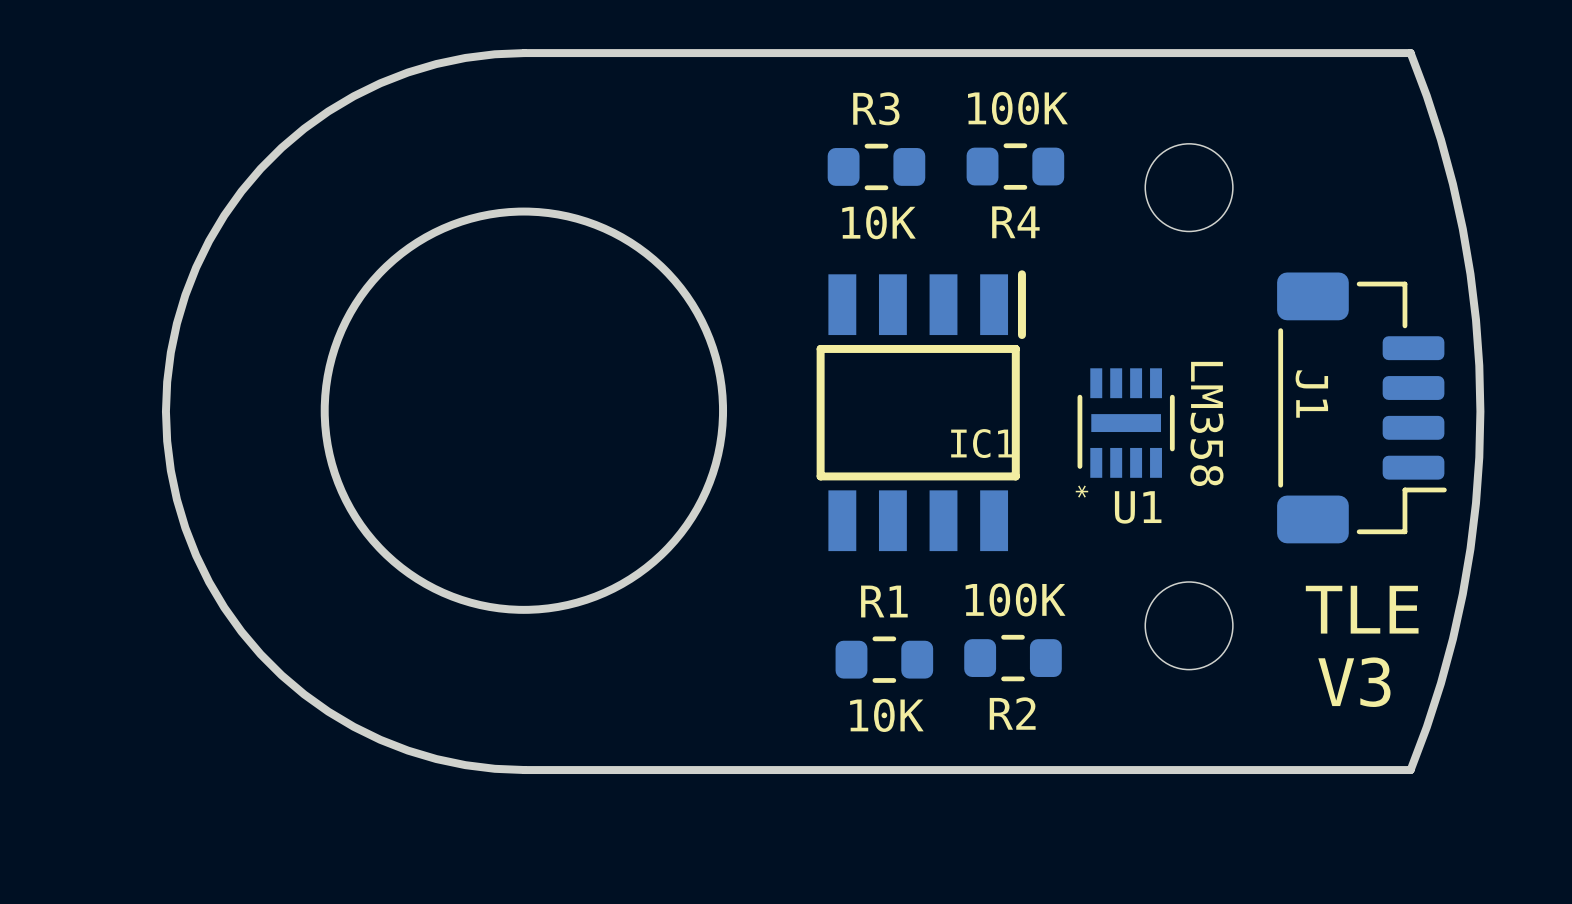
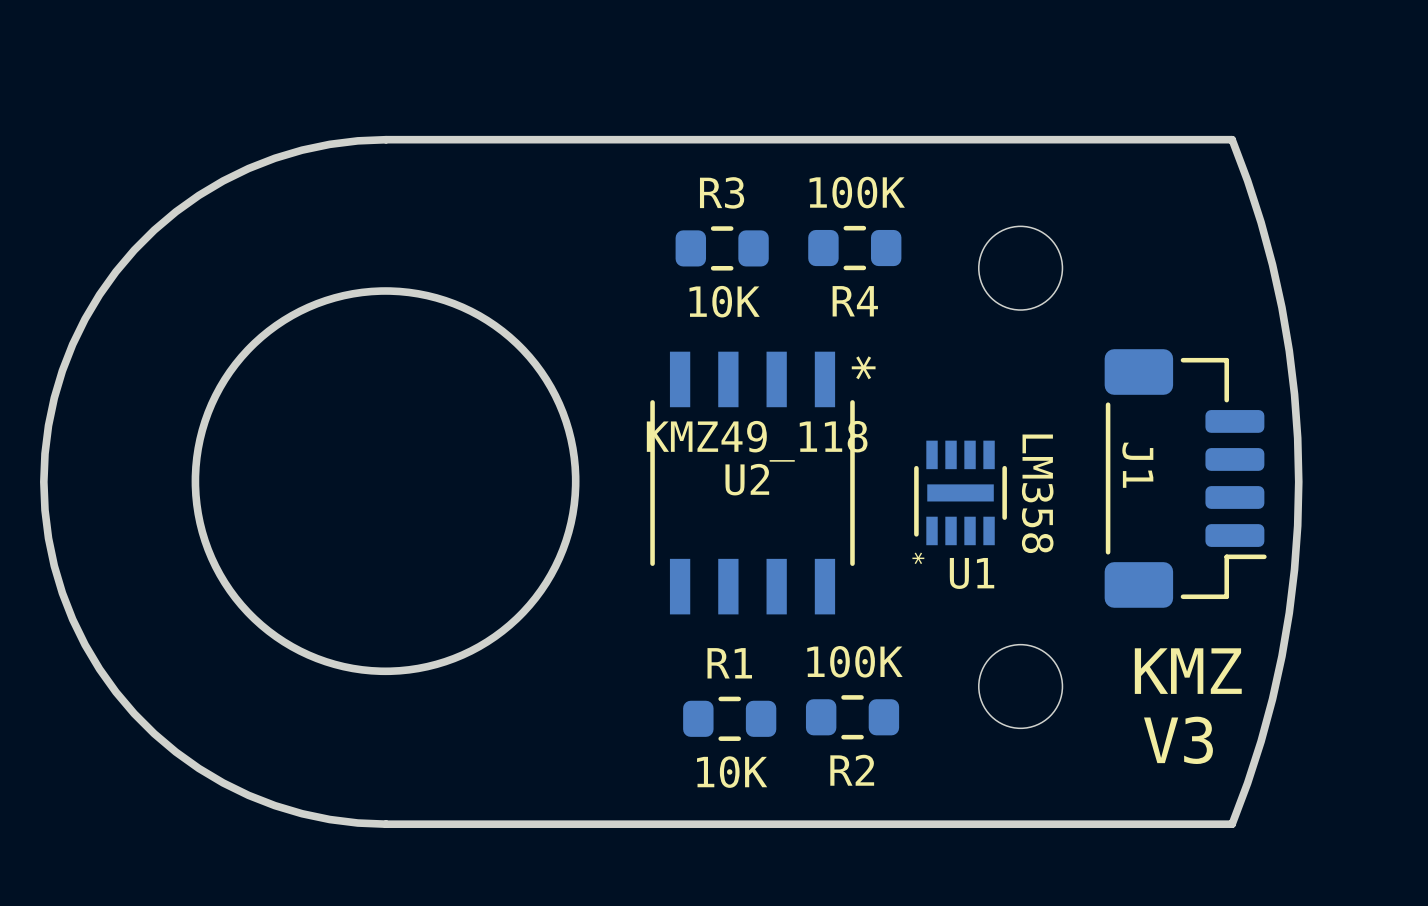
IC1: (921, 410) -> none
U2: none -> KMZ49_118 (752, 483)
text: TLE (1362, 609) -> KMZ (1188, 671)

